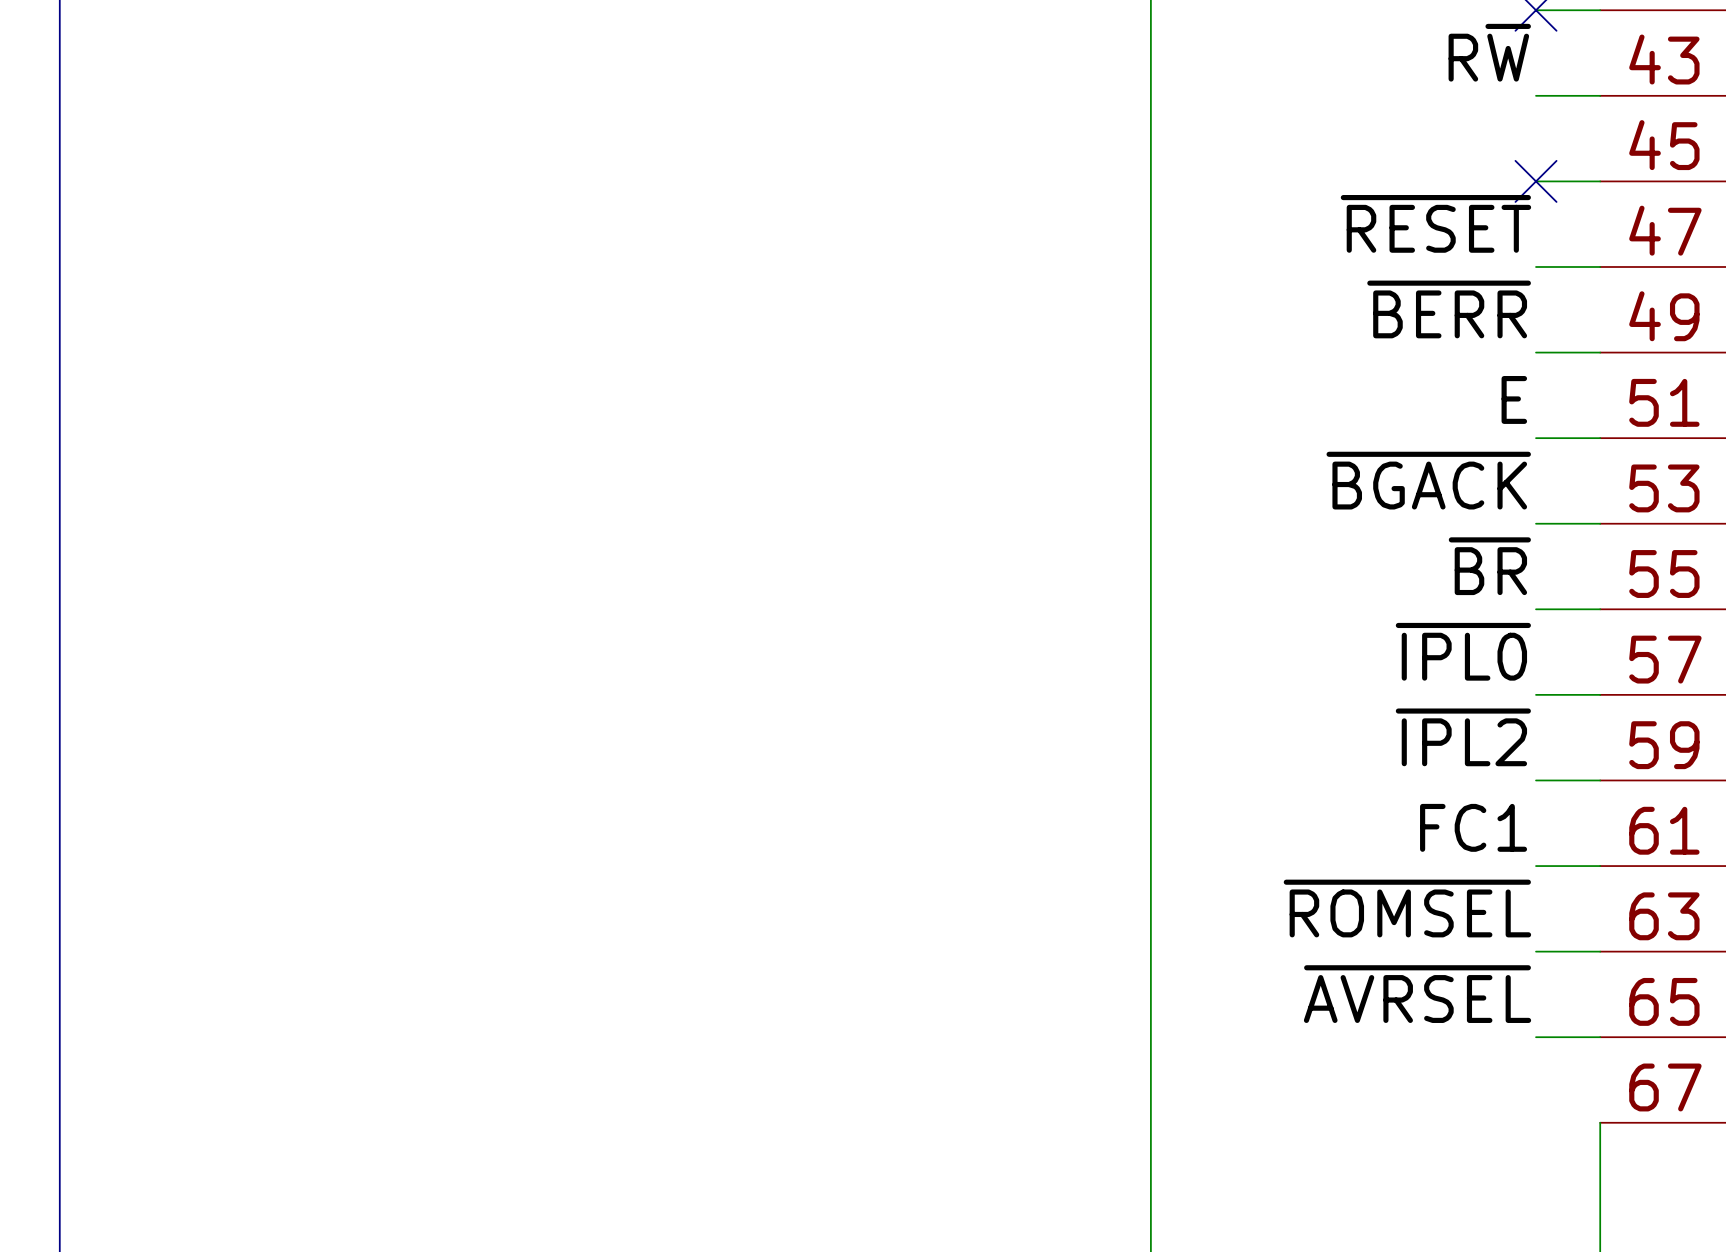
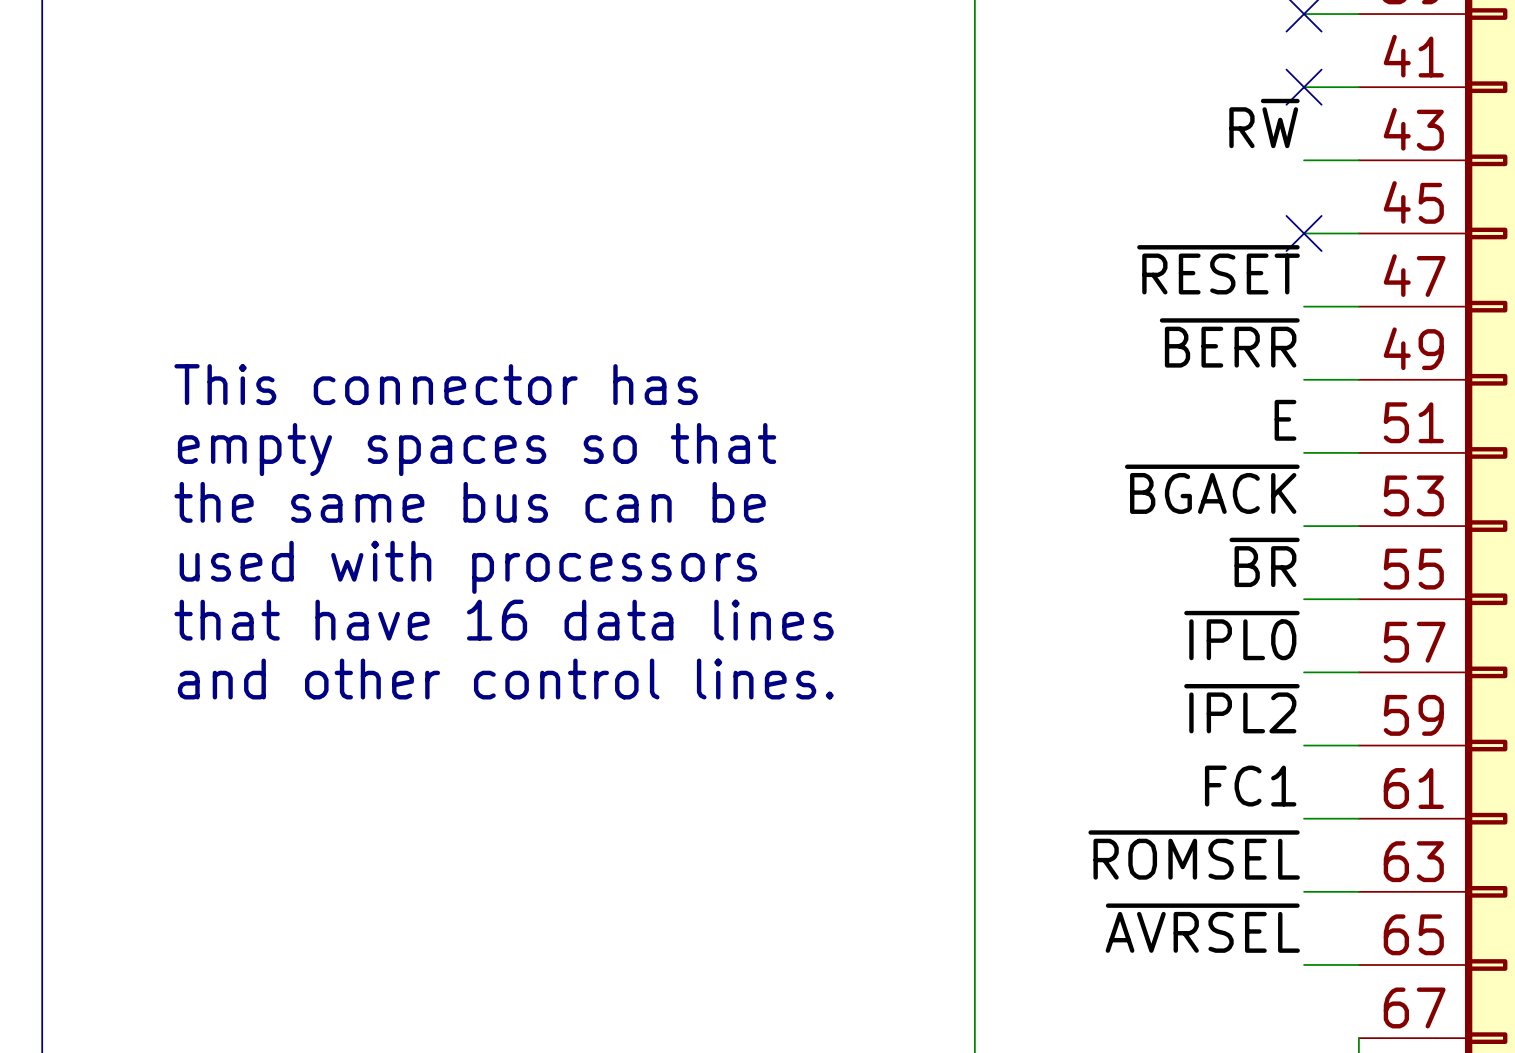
text: none -> This connector has (436, 384)
text: none -> empty spaces so that (477, 449)
text: none -> the same bus can be (470, 502)
text: none -> used with processors (468, 567)
text: none -> that have 16 data lines (504, 620)
text: none -> and other control lines. (505, 679)

